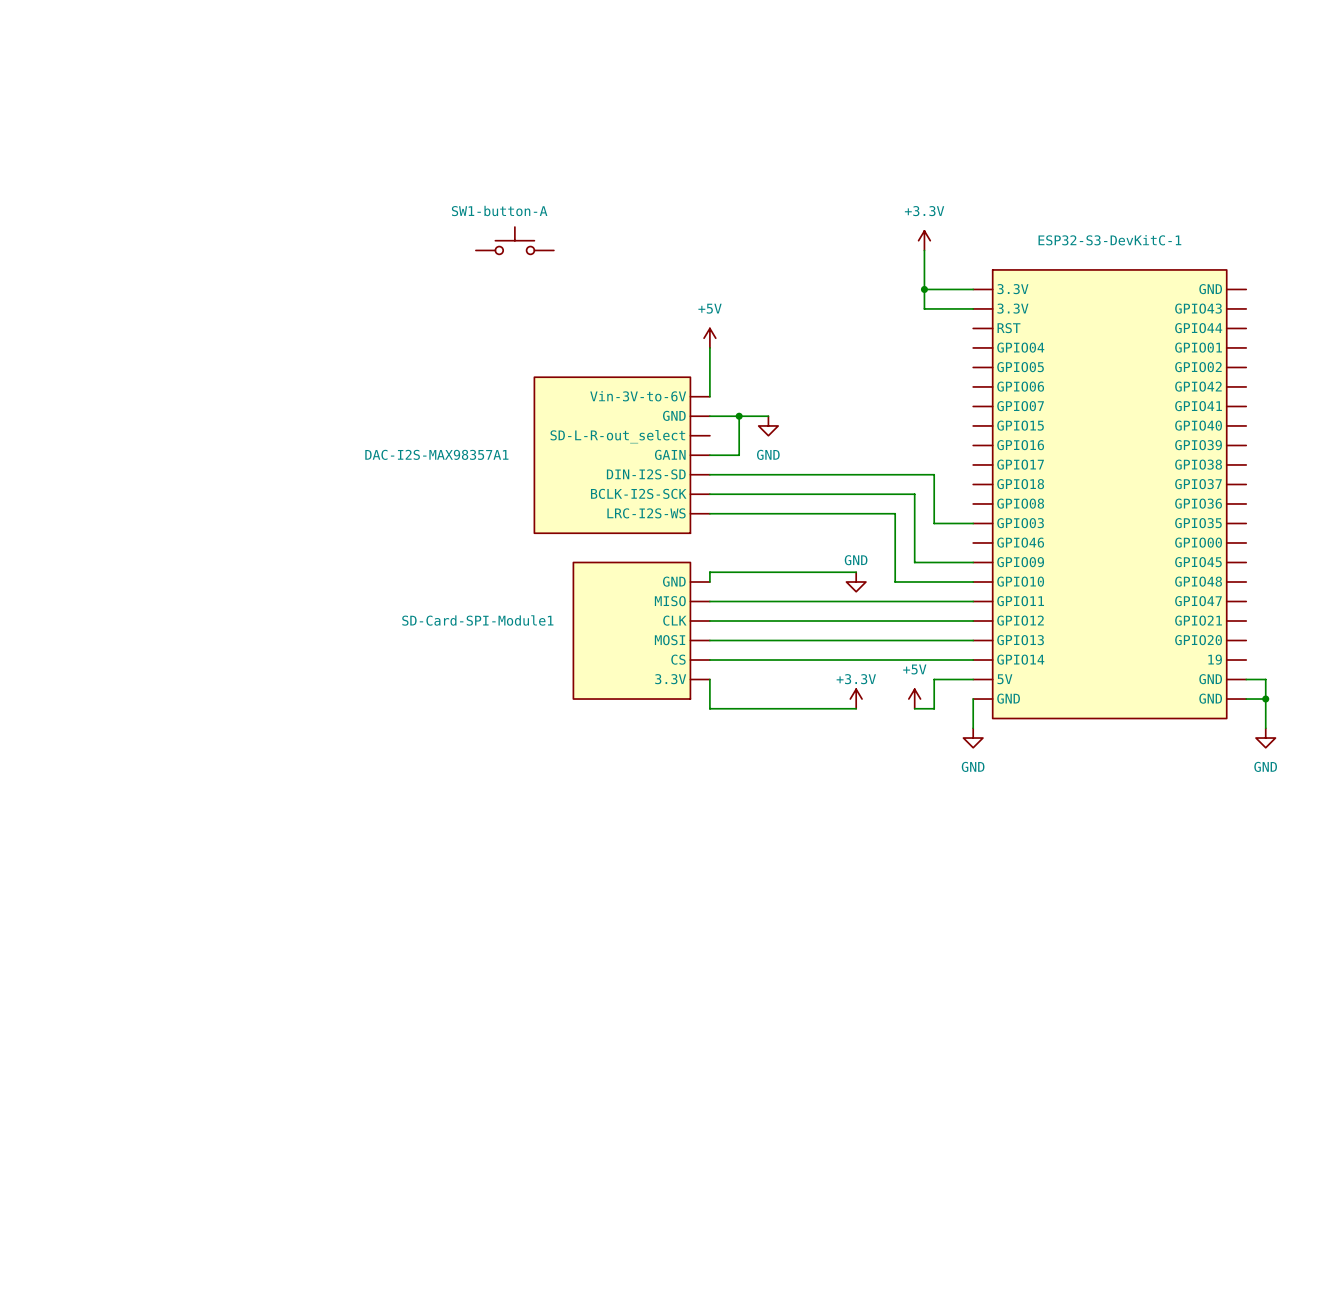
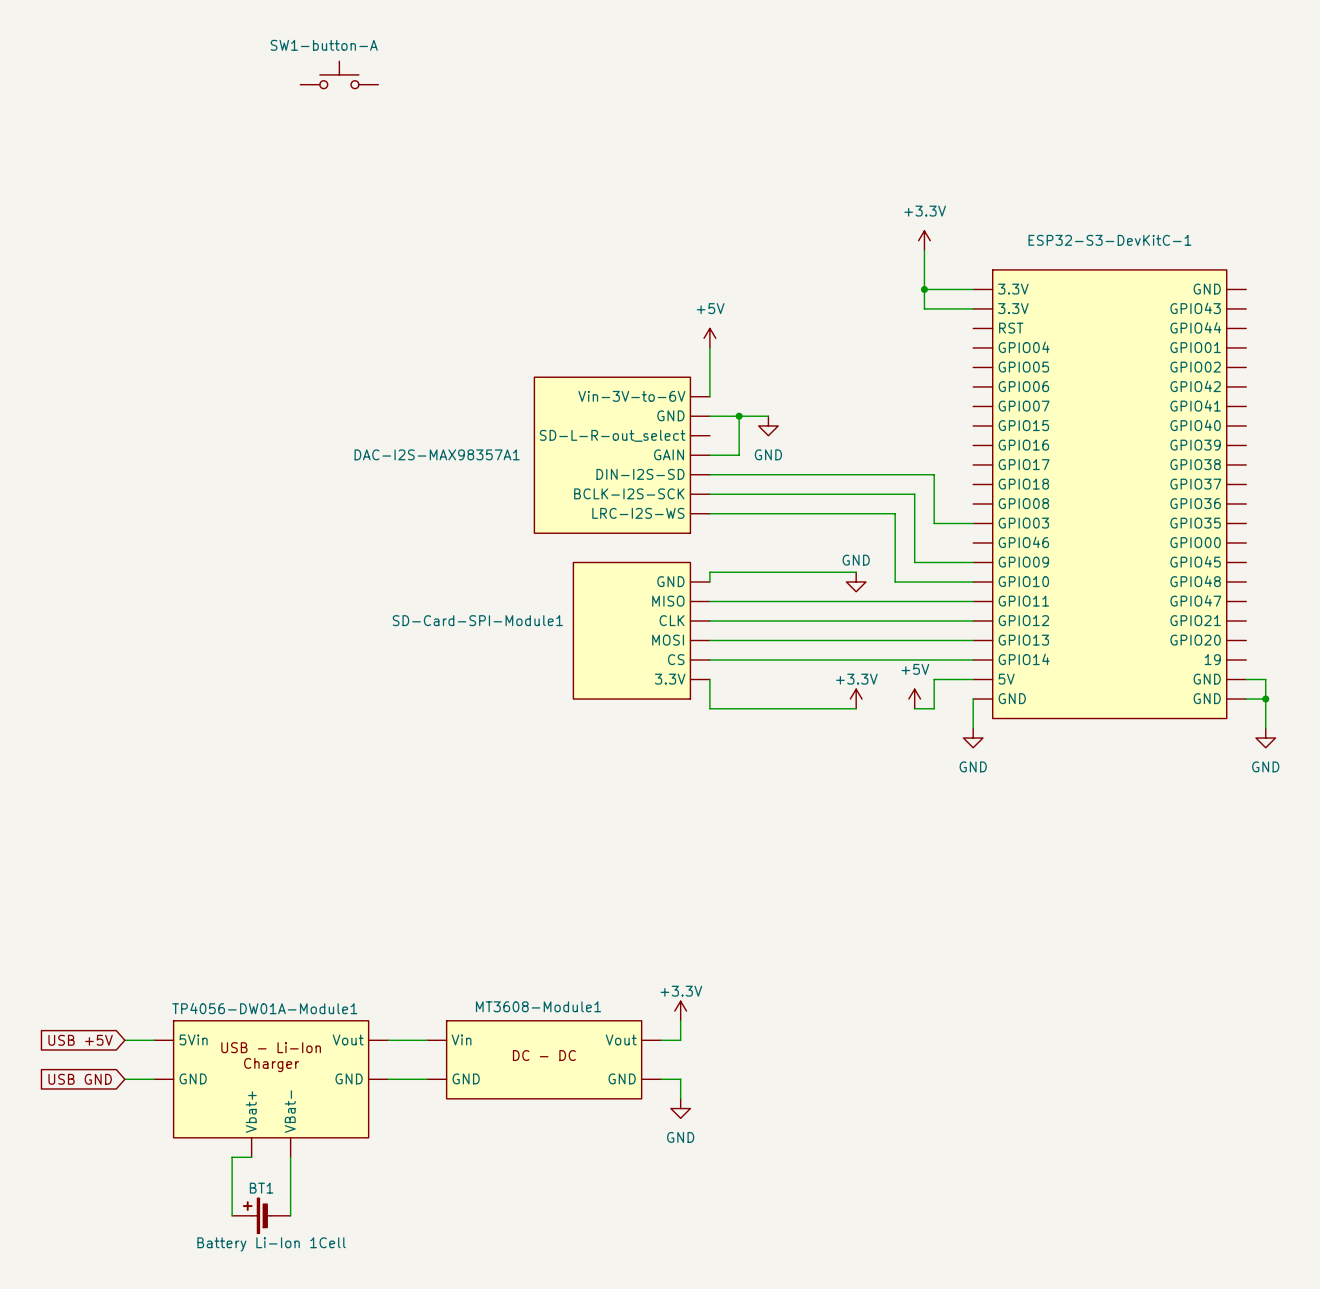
SW1-button-A position: (514, 240) -> (339, 74)
power symbol: none -> +3.3V (680, 1011)
MT3608-Module1: none -> (544, 1020)
wire: none -> (680, 1020) (680, 1040) (661, 1040)
global label: none -> USB +5V (80, 1040)
wire: none -> (124, 1040) (154, 1040)
wire: none -> (388, 1040) (427, 1040)
global label: none -> USB GND (80, 1079)
wire: none -> (124, 1079) (154, 1079)
wire: none -> (388, 1079) (427, 1079)
wire: none -> (661, 1079) (680, 1079) (680, 1098)
TP4056-DW01A-Module1: none -> (271, 1089)
power symbol: none -> GND (680, 1108)
wire: none -> (251, 1157) (232, 1157) (232, 1215)
wire: none -> (290, 1157) (290, 1215)
BT1: none -> Battery Li-Ion 1Cell (261, 1215)

